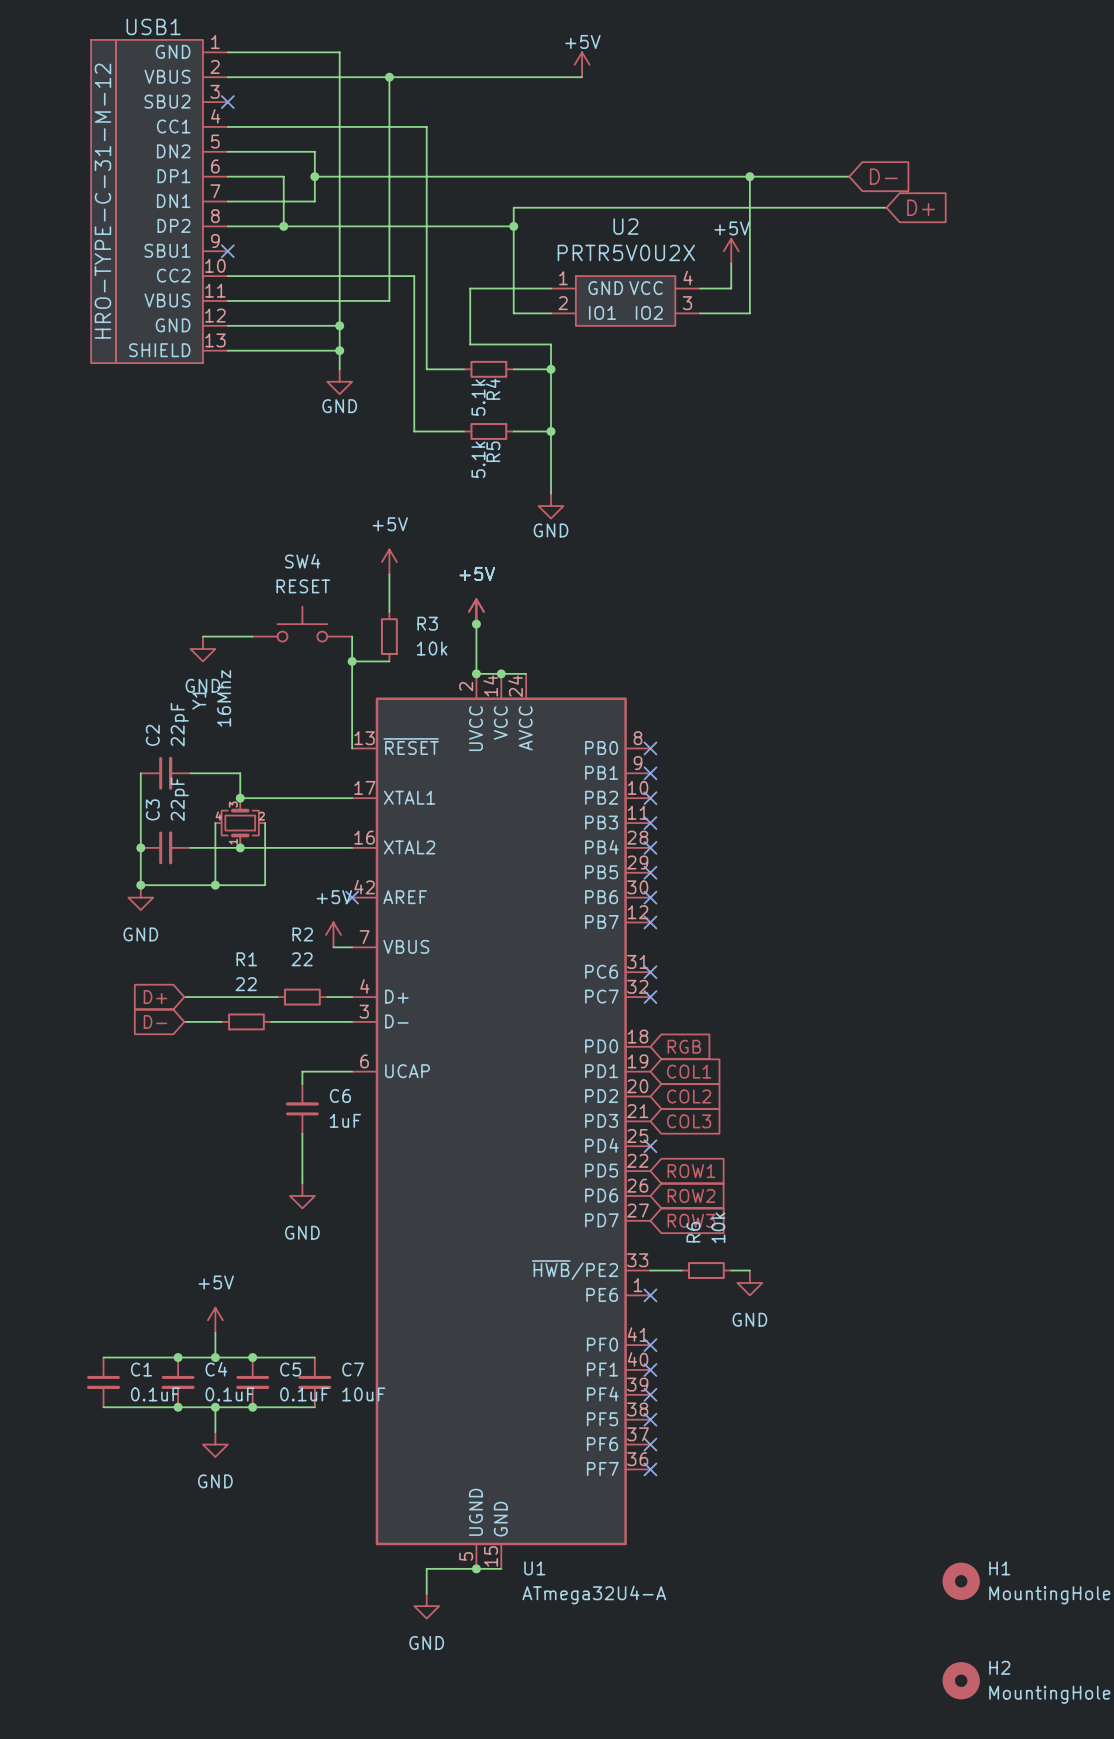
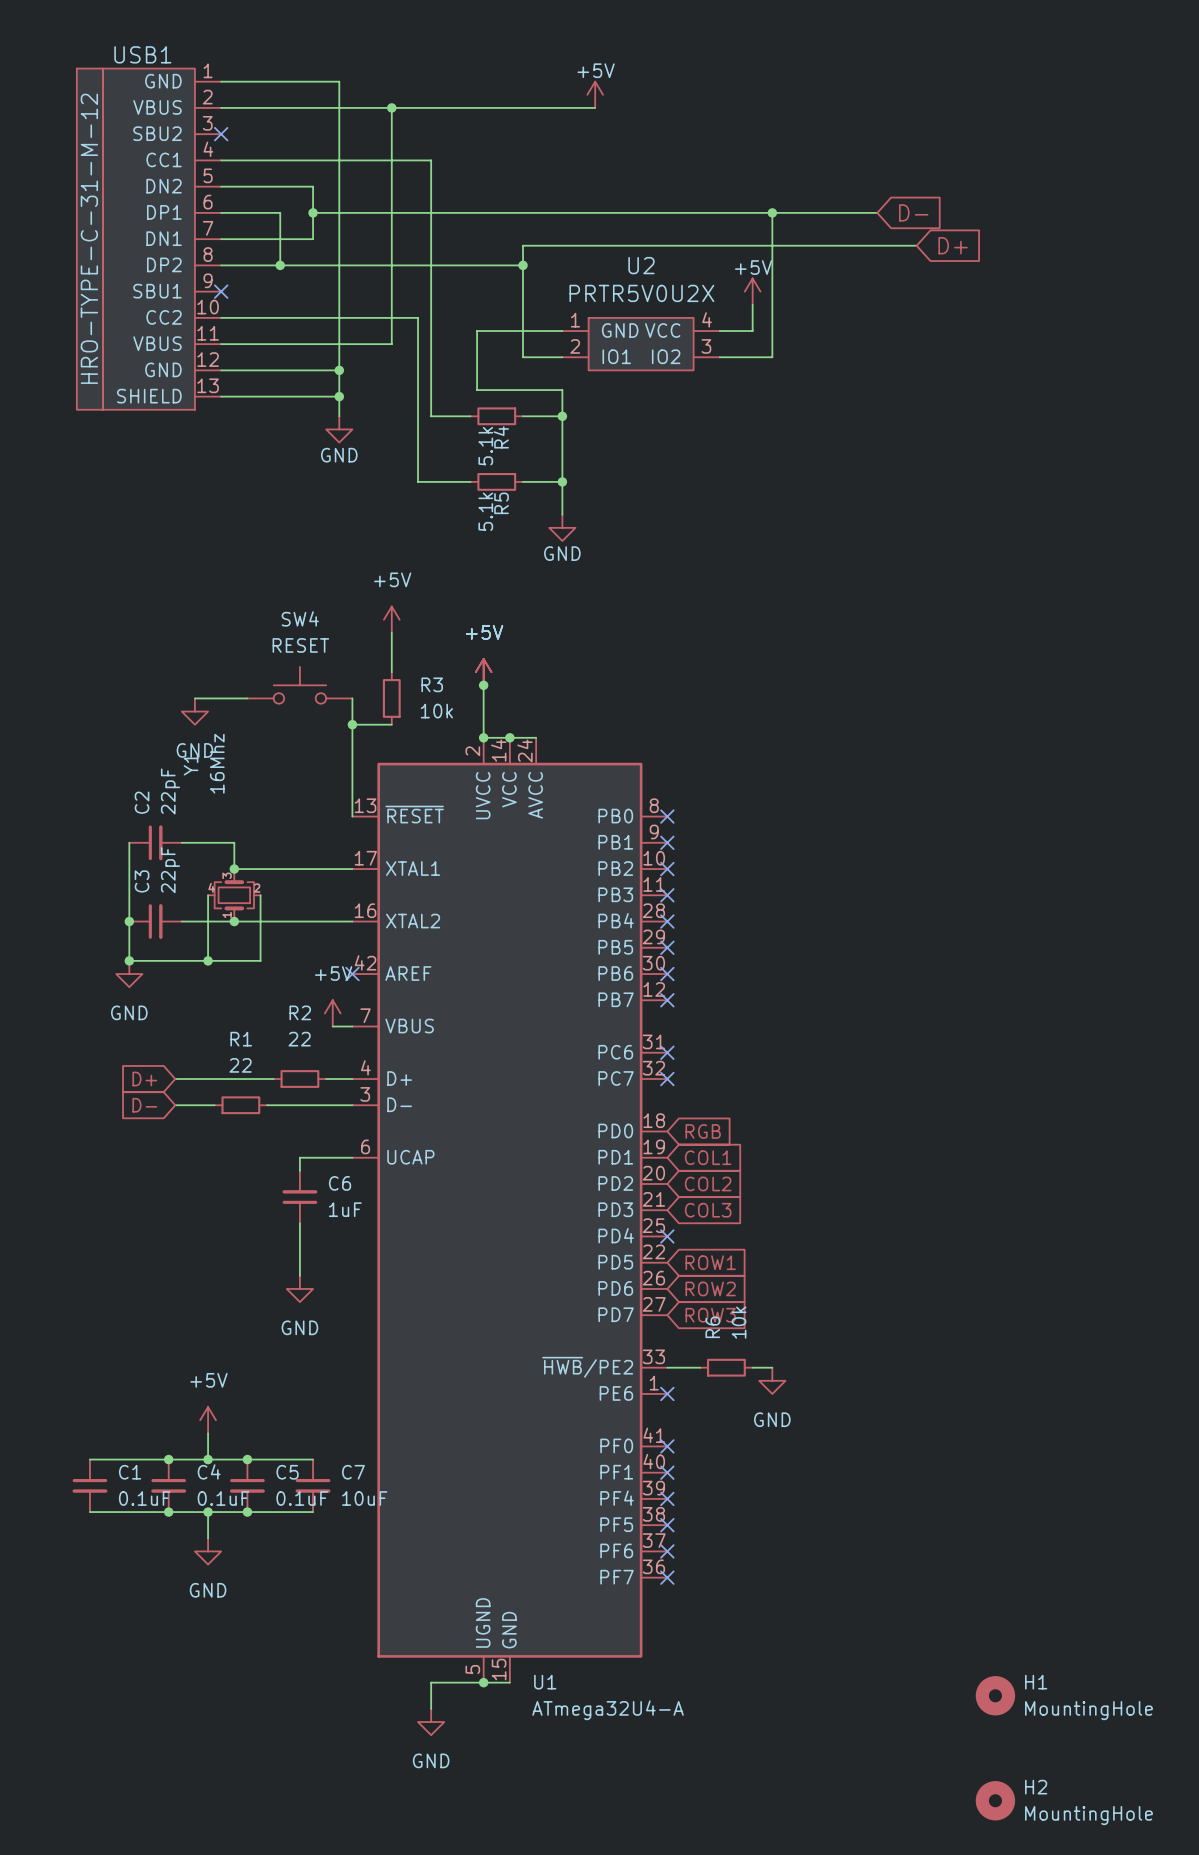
wire: (551, 462) (551, 493) -> none
power symbol position: GND (551, 506) -> GND (562, 527)

